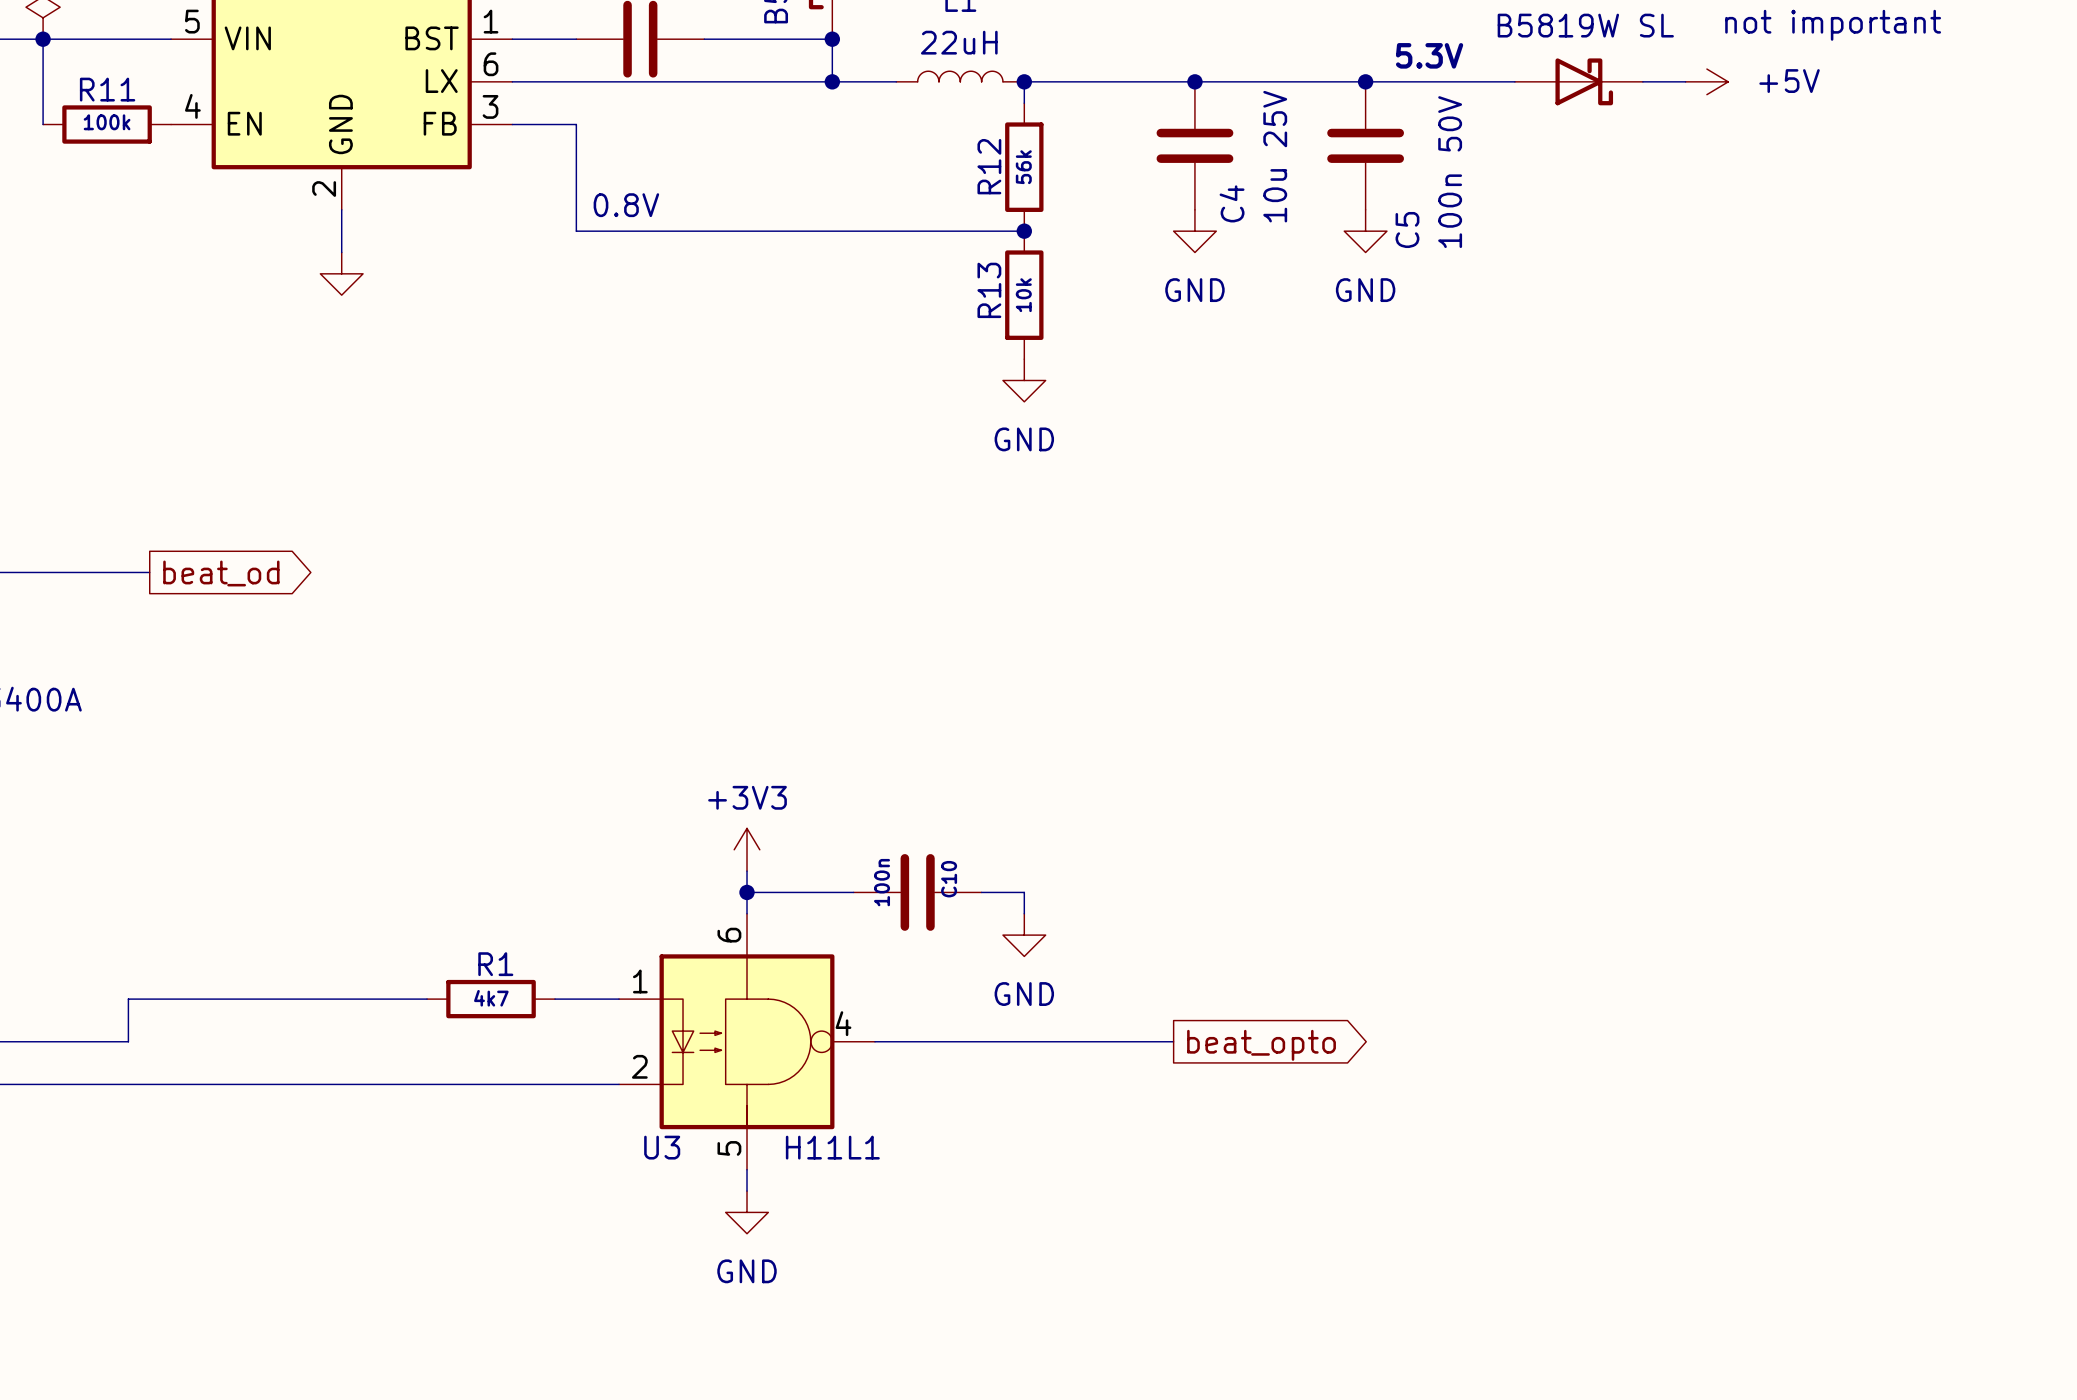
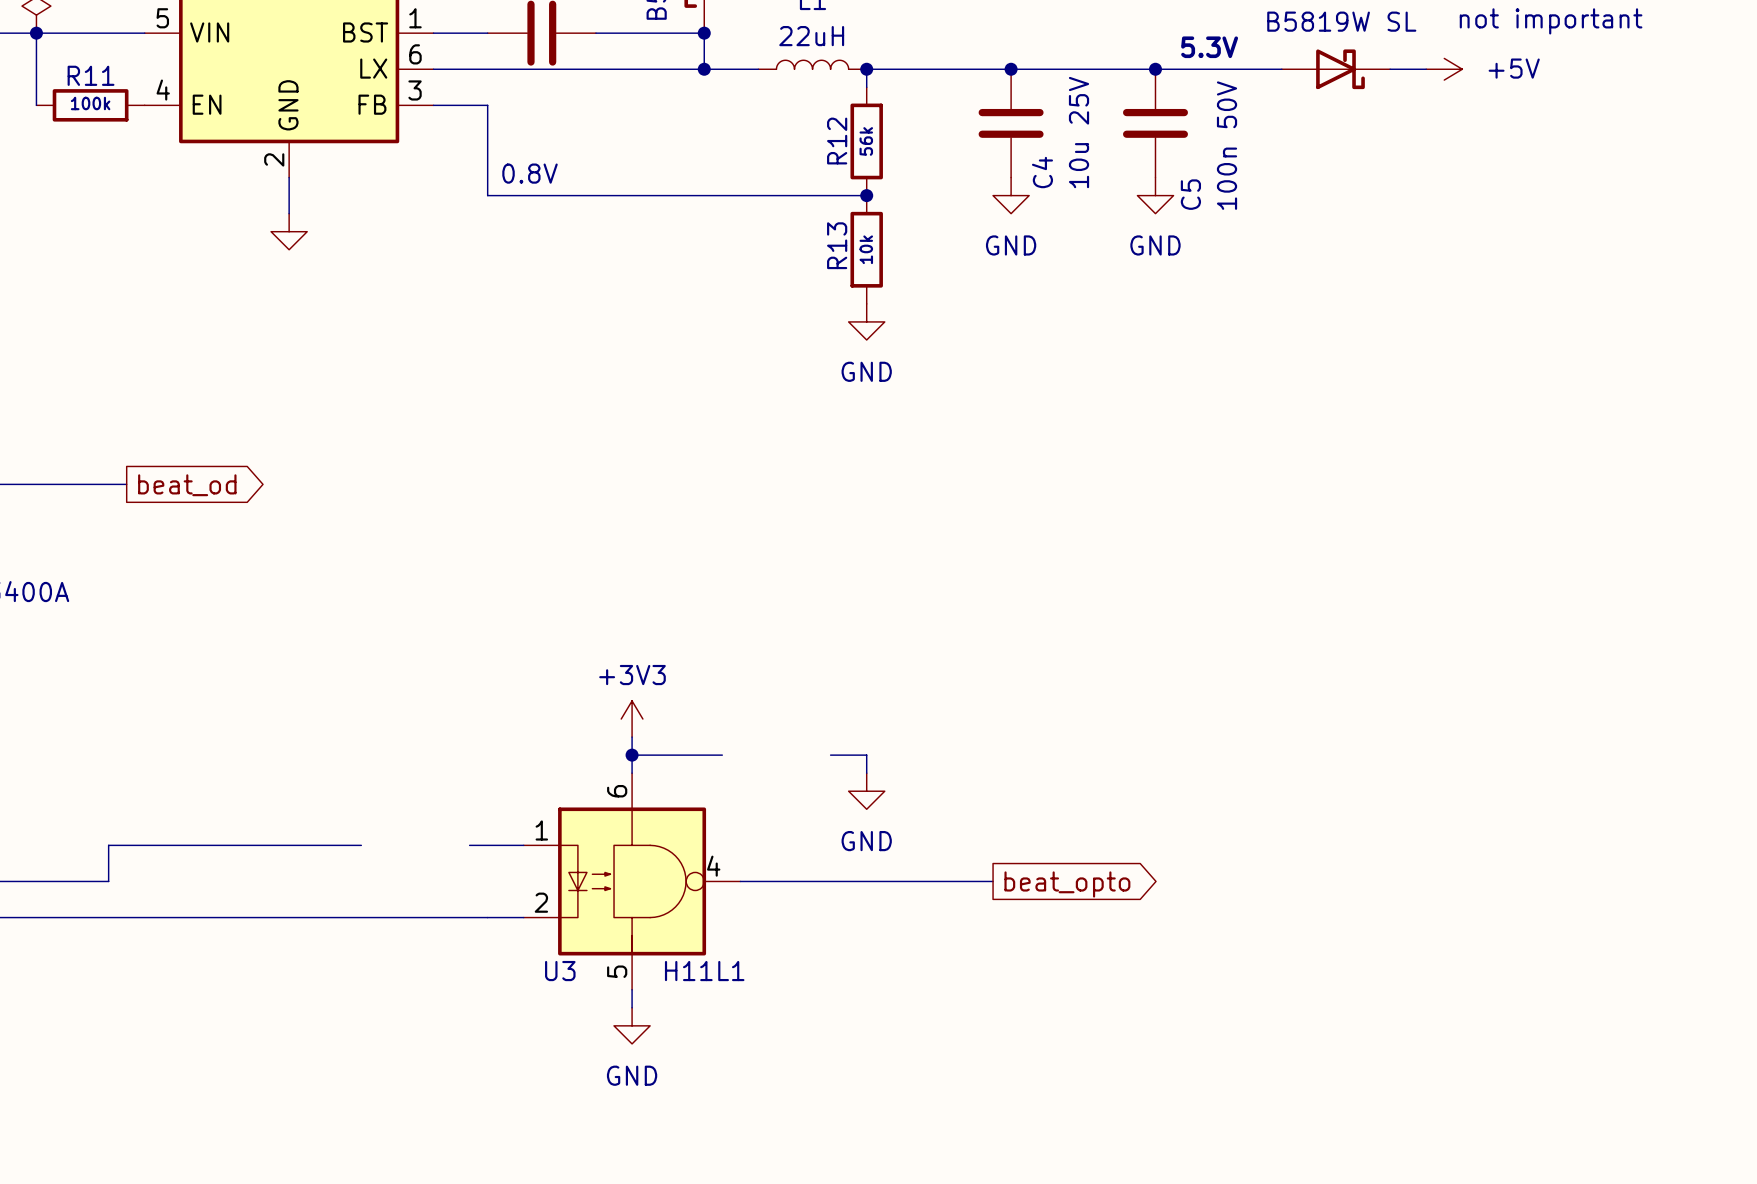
C10: 100n (917, 892) -> none
R1: 4k7 (491, 999) -> none

